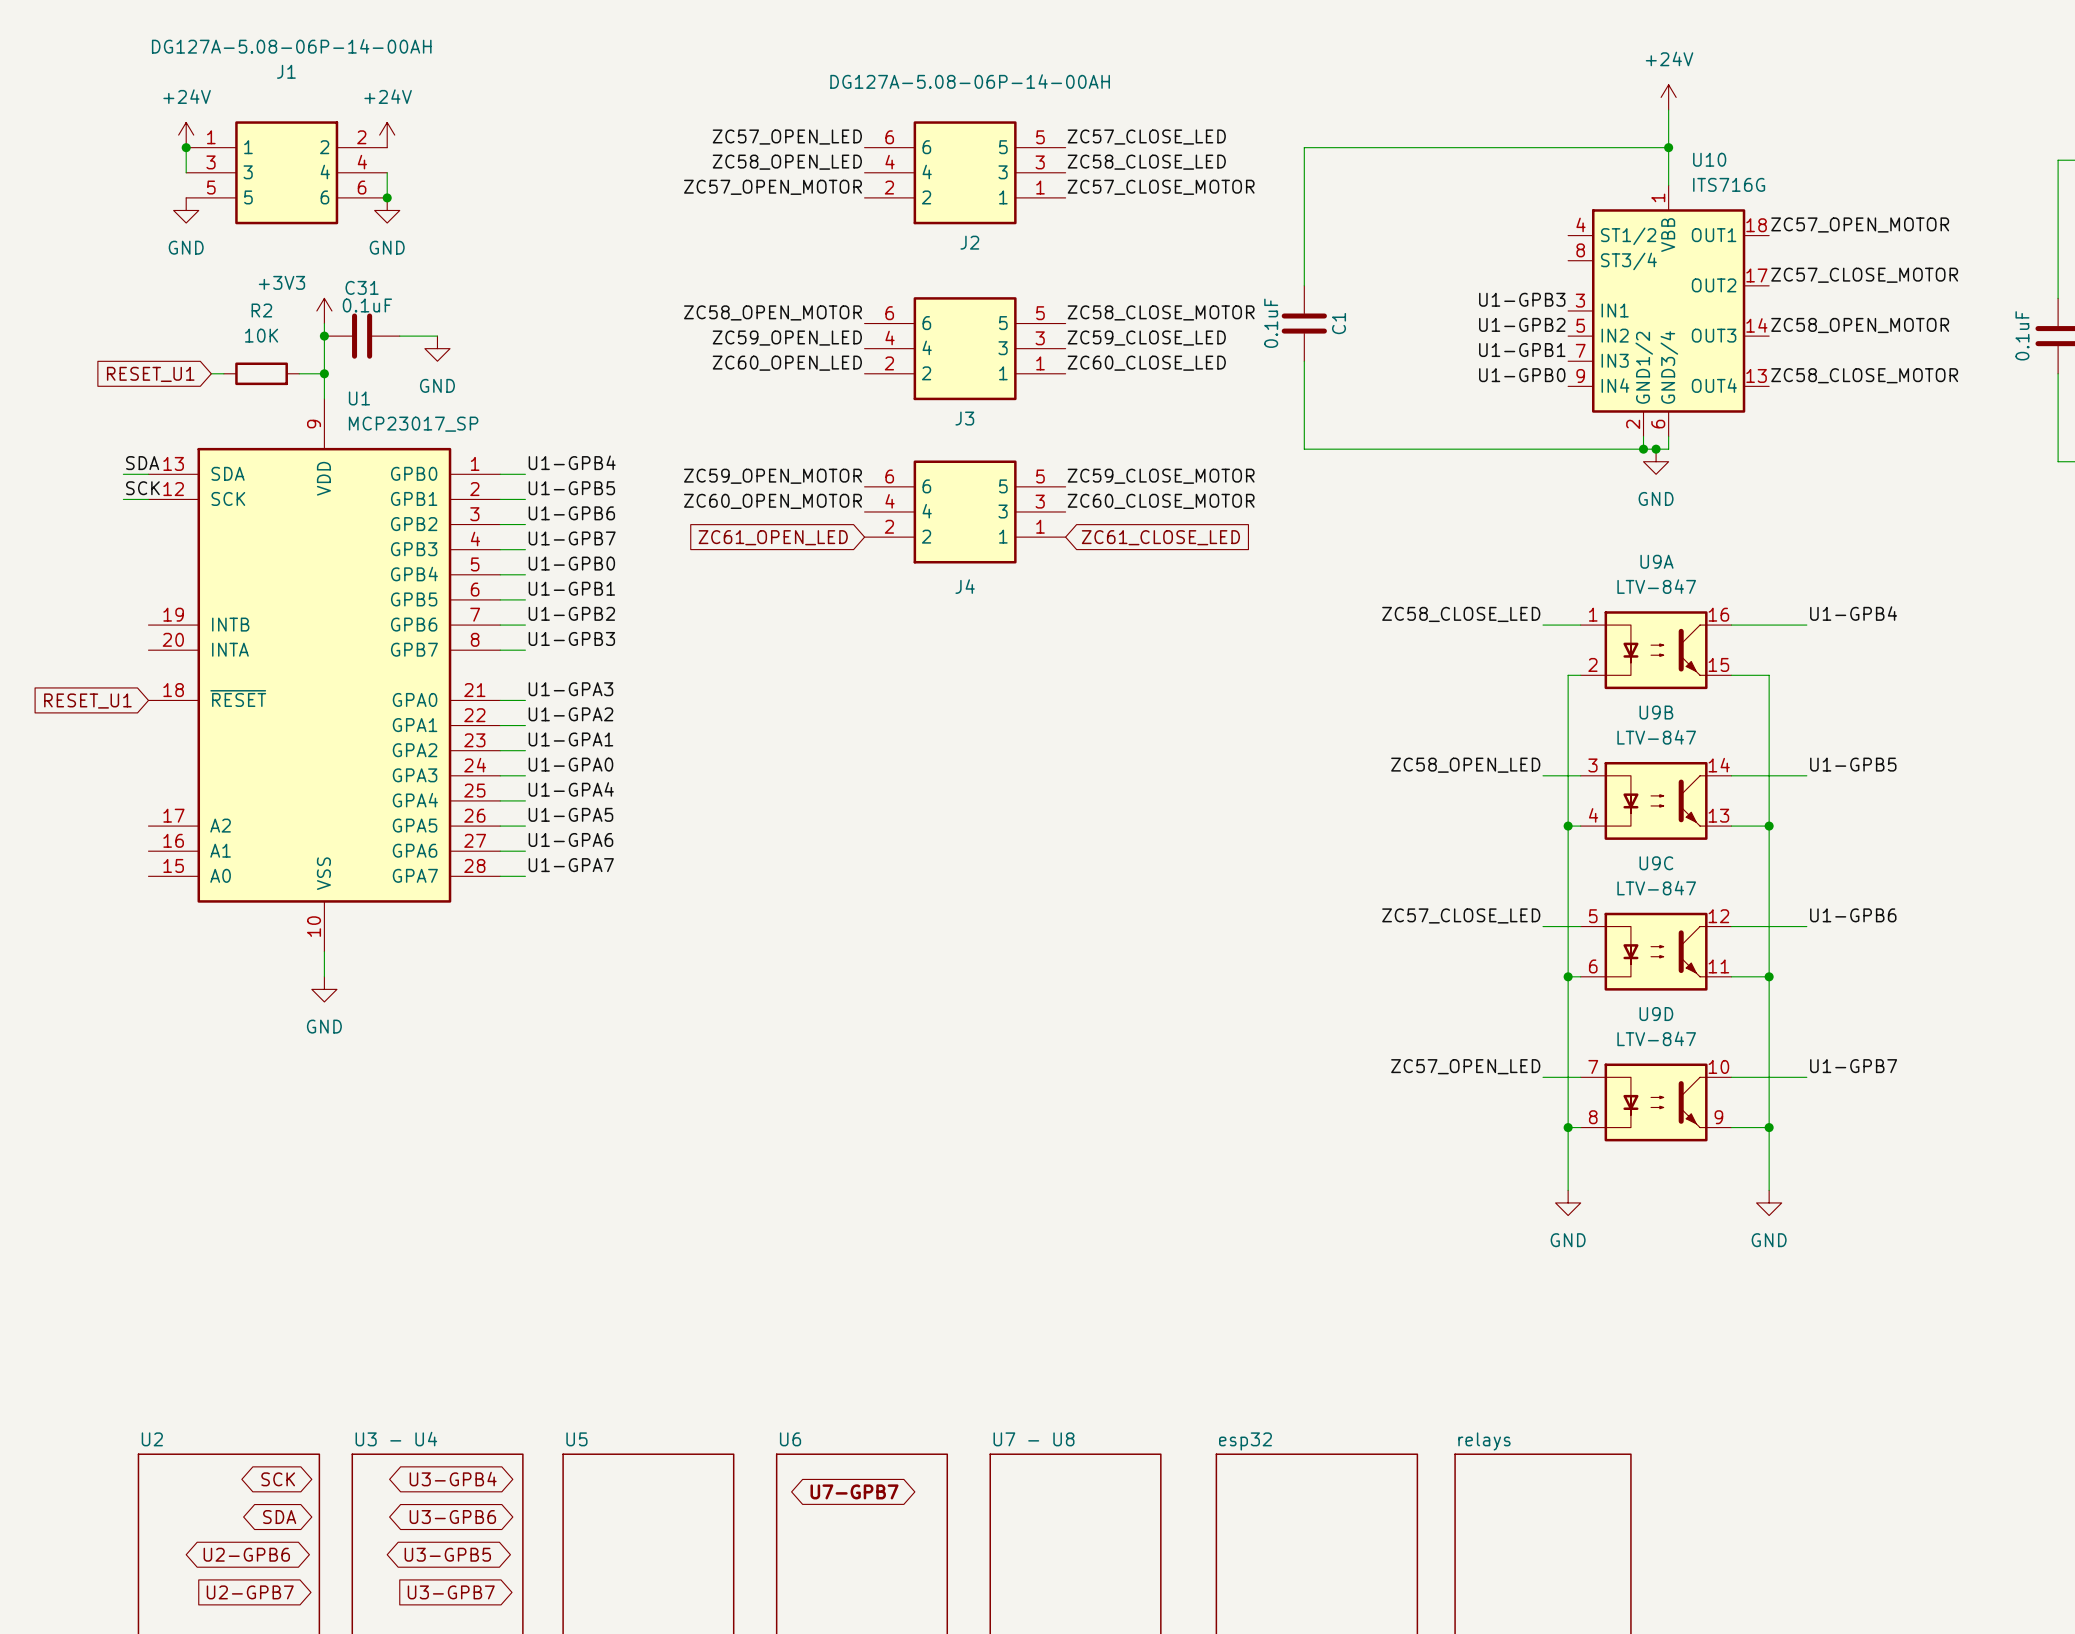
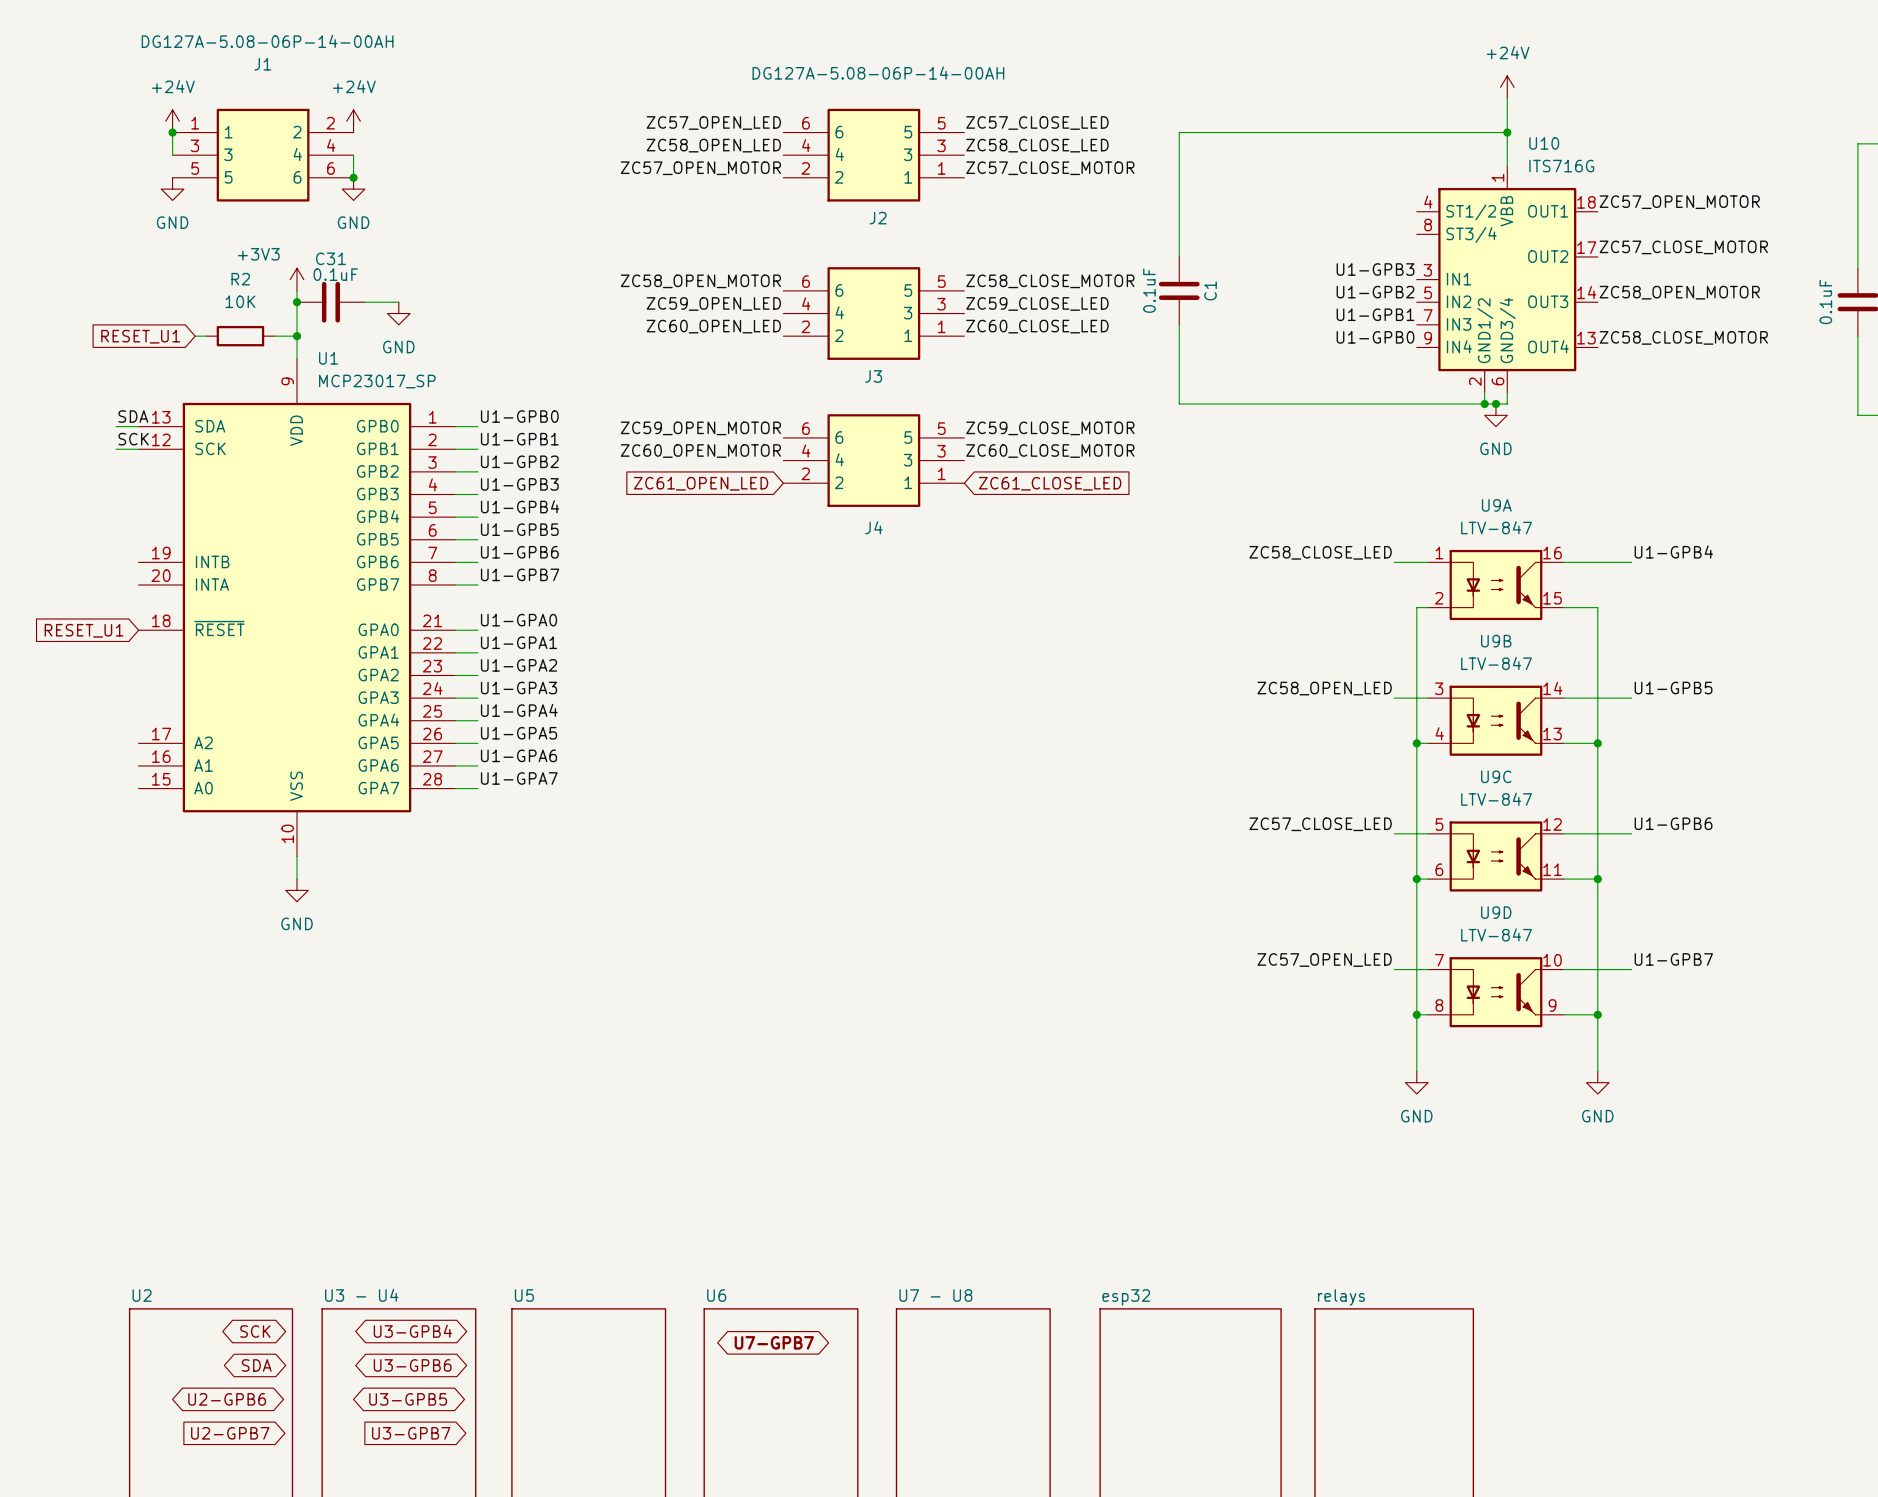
label: U1-GPB4 (572, 462) -> U1-GPB0 (519, 416)
label: U1-GPB5 (571, 488) -> U1-GPB1 (519, 439)
label: U1-GPB6 (571, 513) -> U1-GPB2 (519, 461)
label: U1-GPB7 (572, 538) -> U1-GPB3 (519, 484)
label: U1-GPB0 (571, 563) -> U1-GPB4 (520, 506)
label: U1-GPB1 (571, 588) -> U1-GPB5 (519, 529)
label: U1-GPB2 (571, 613) -> U1-GPB6 (519, 552)
label: U1-GPB3 (571, 638) -> U1-GPB7 (520, 574)
label: U1-GPA3 (570, 689) -> U1-GPA0 (519, 620)
label: U1-GPA2 (570, 714) -> U1-GPA1 (519, 642)
label: U1-GPA1 (570, 739) -> U1-GPA2 (519, 665)
label: U1-GPA0 (570, 764) -> U1-GPA3 (519, 688)

